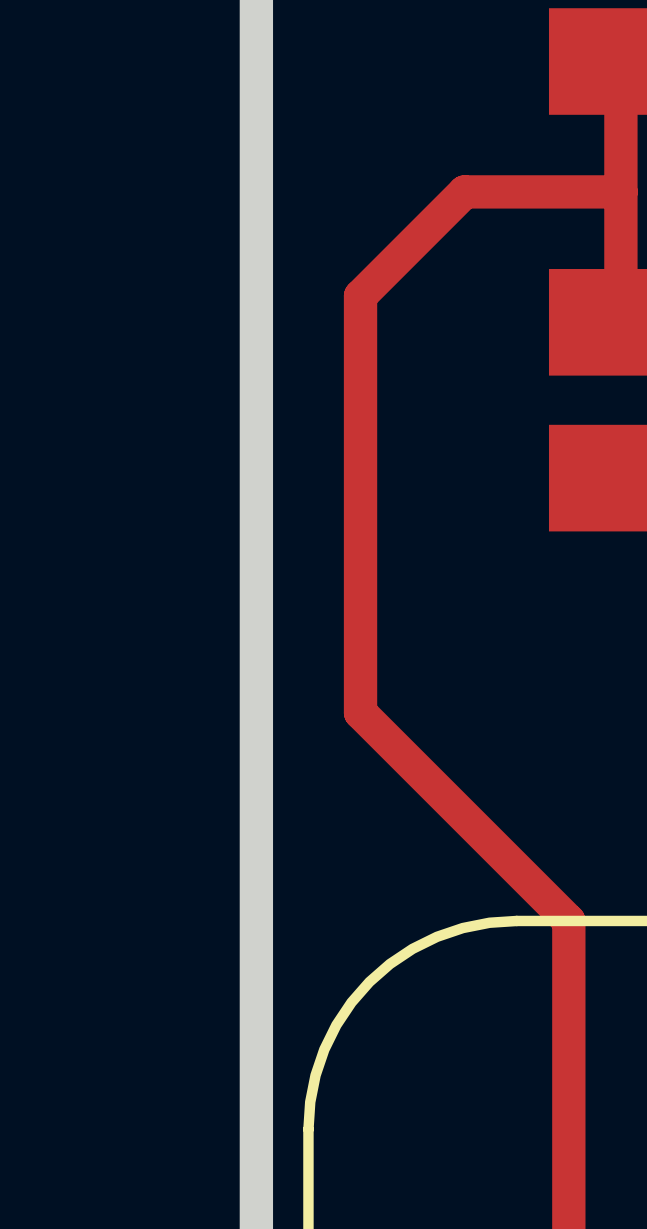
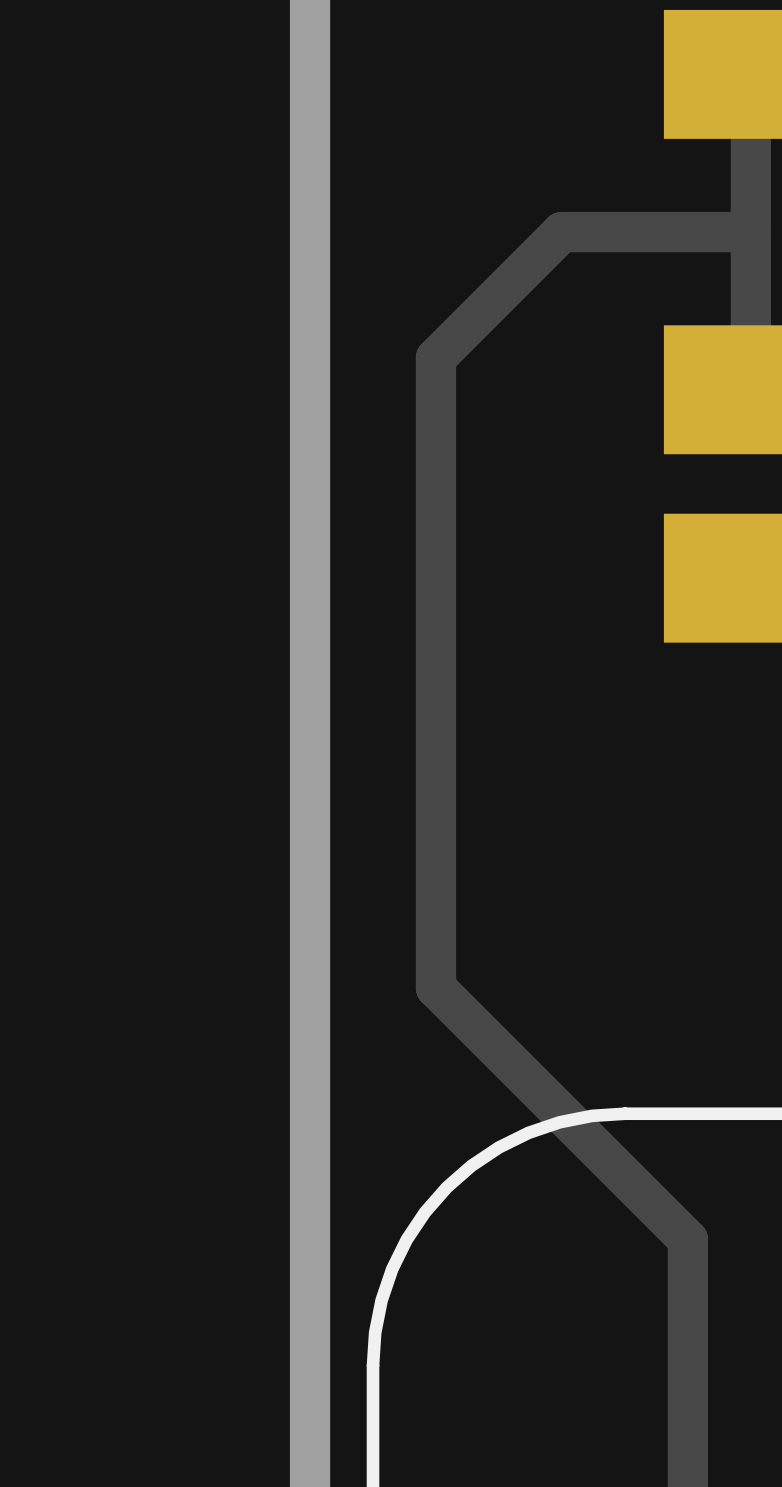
track: (360, 712) (568, 920) (568, 1025) -> (435, 861) (435, 987) (687, 1239)

